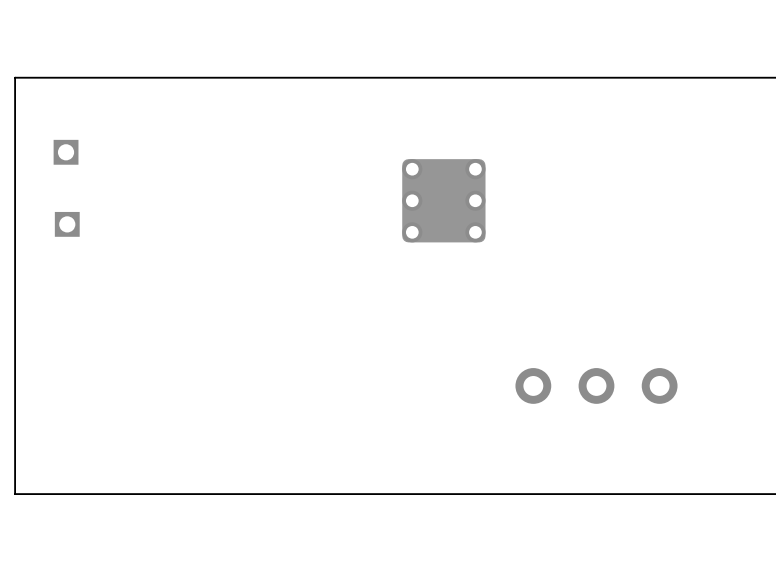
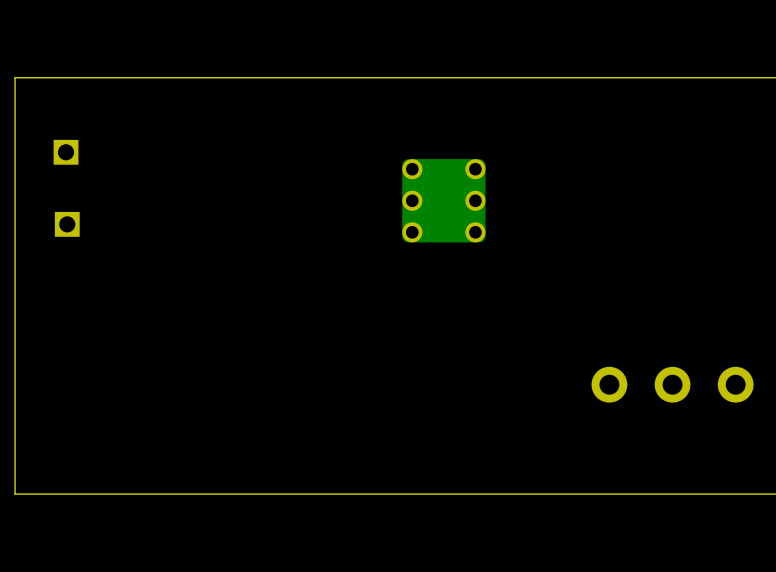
part position: (596, 385) -> (672, 384)

